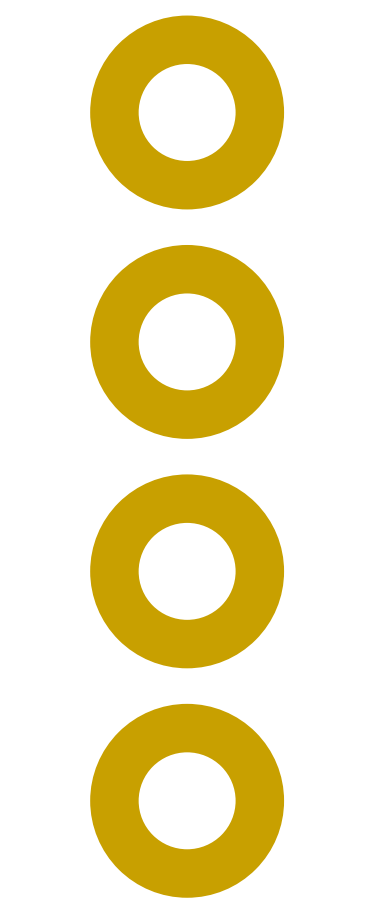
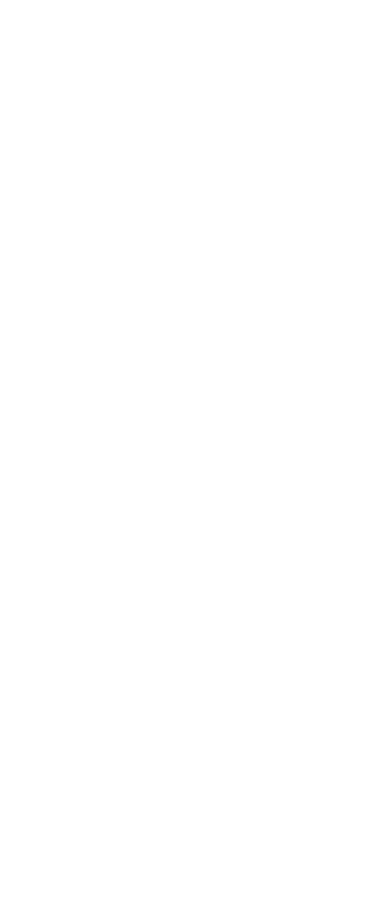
part: (187, 112) -> none
part: (187, 341) -> none
part: (187, 571) -> none
part: (187, 800) -> none

